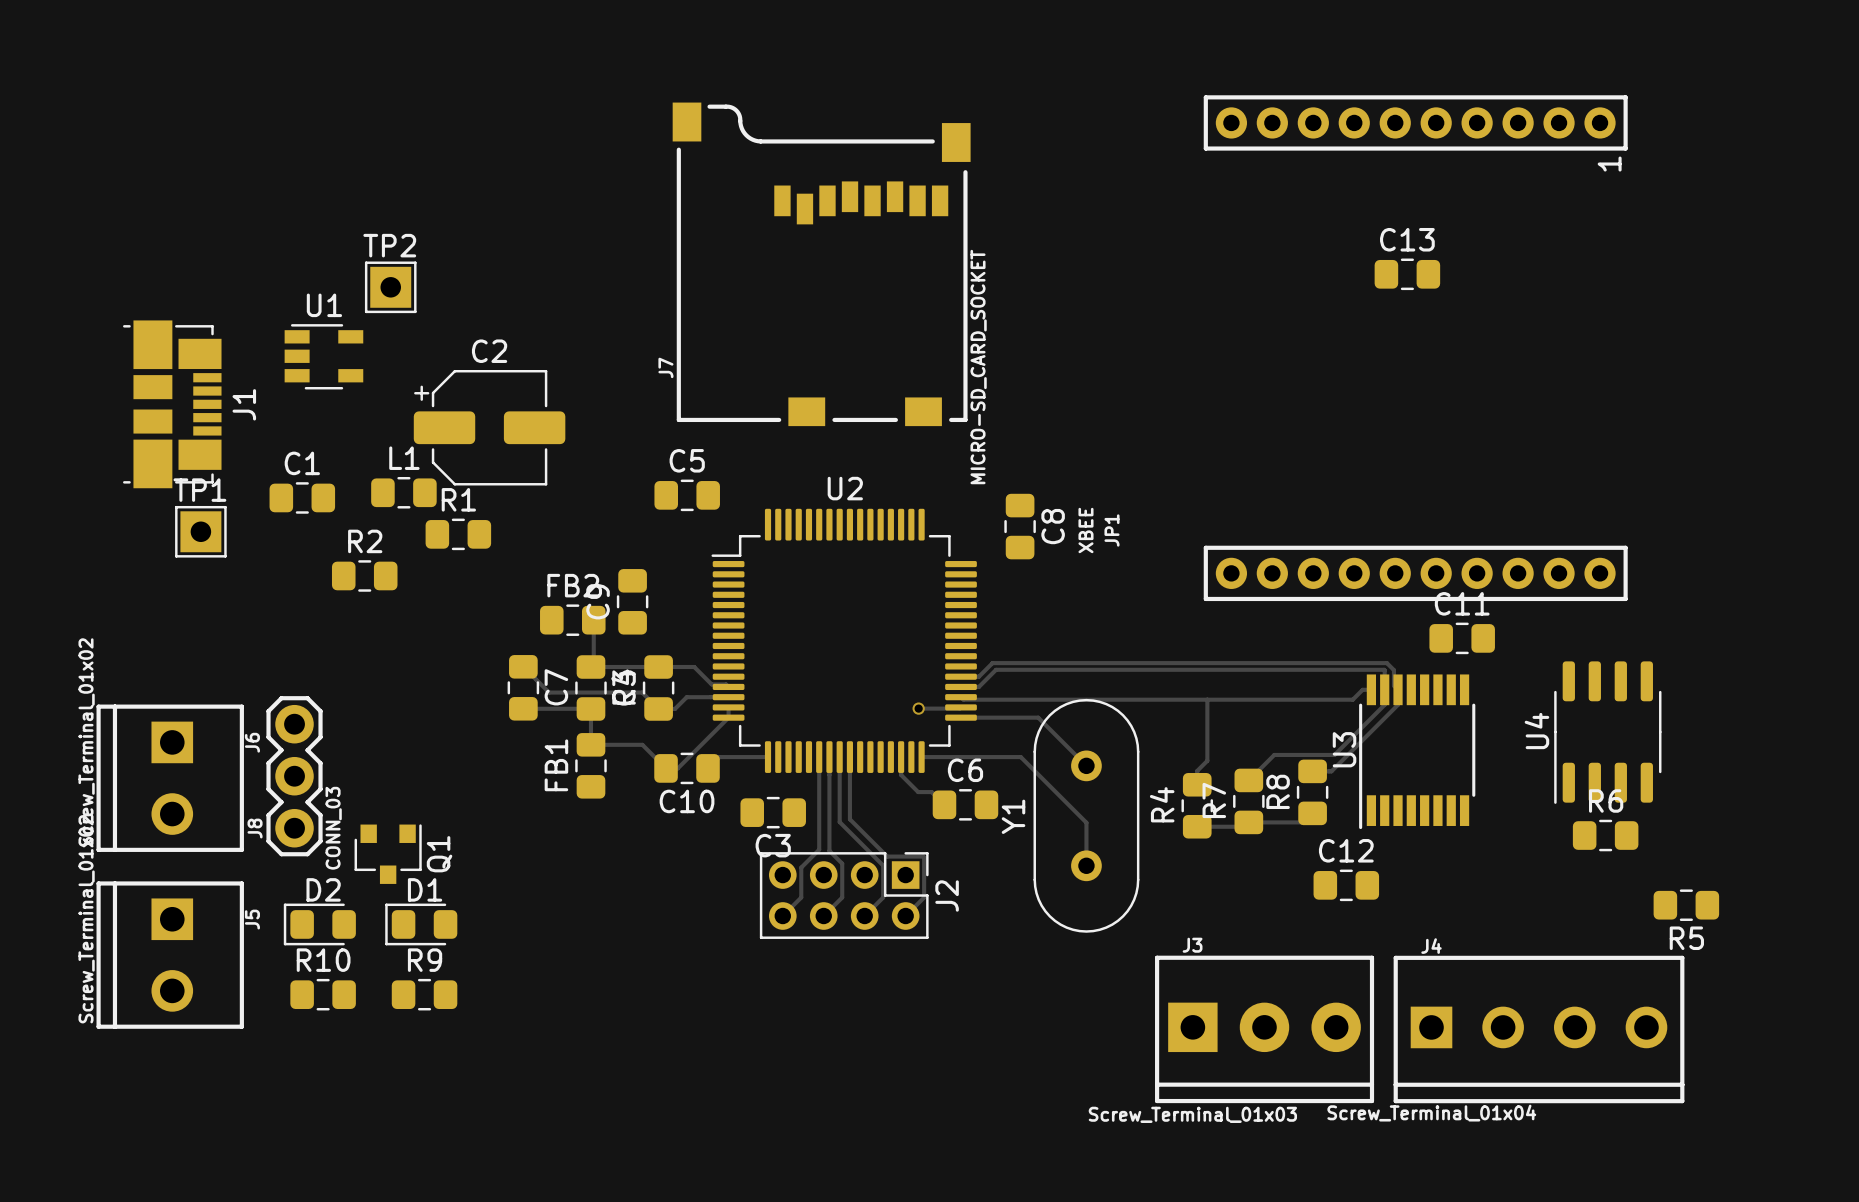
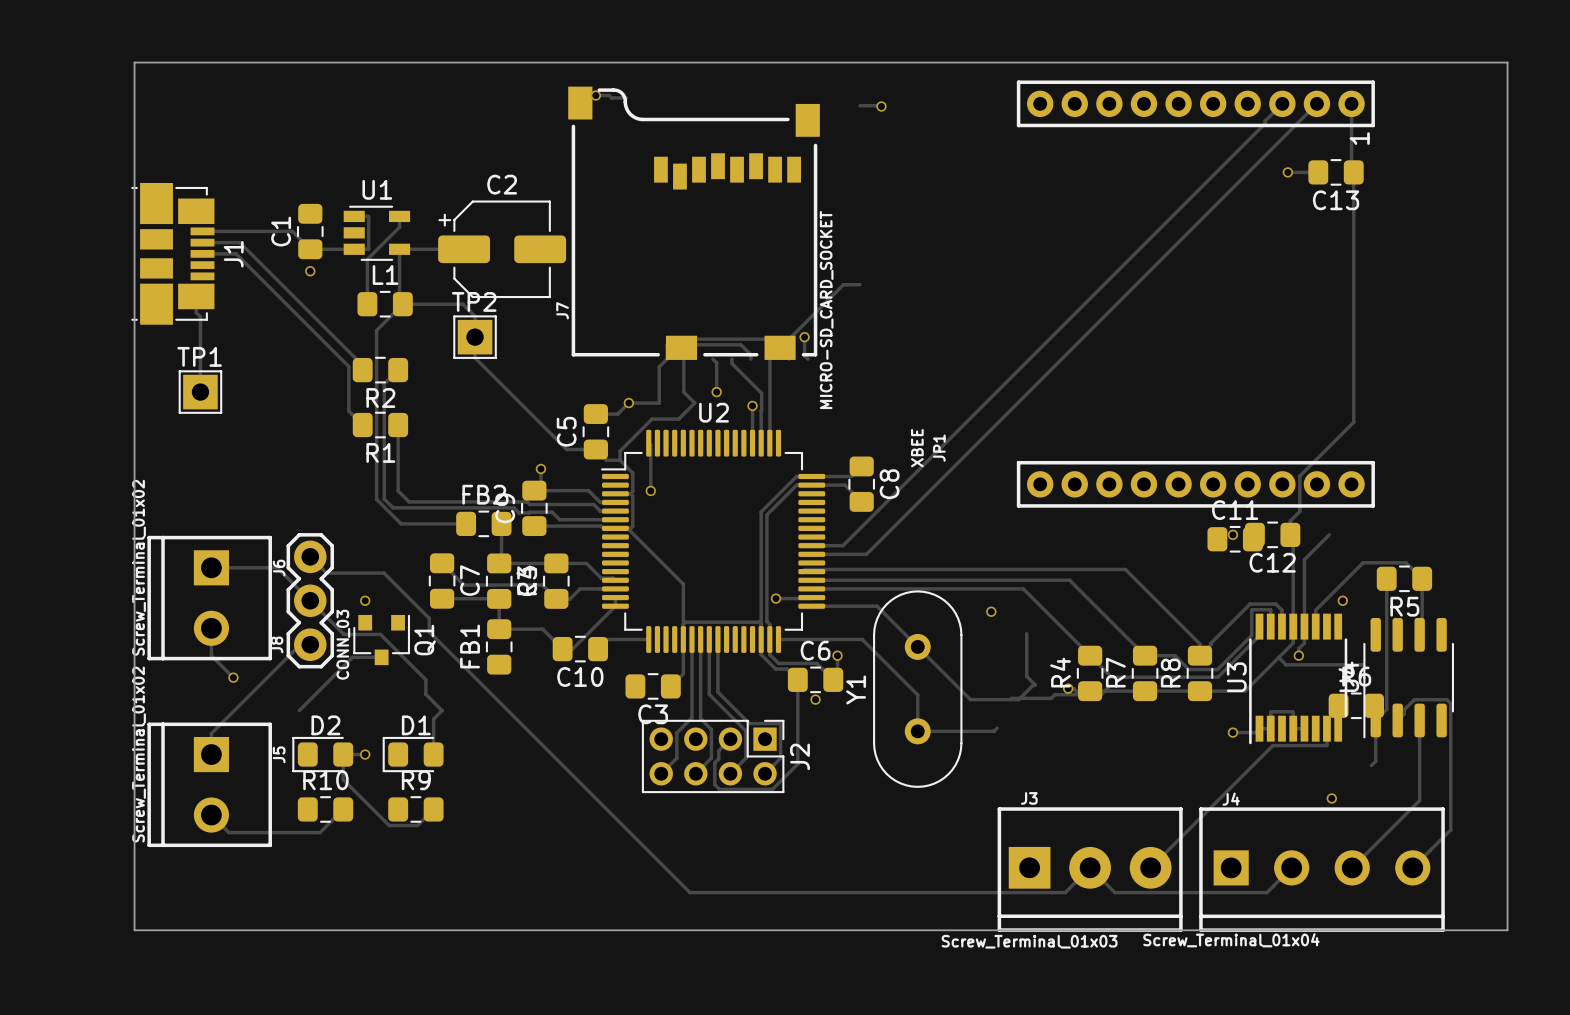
board edge: none -> (134, 62) (134, 930) (1507, 930) (1507, 62) (134, 62)
track: none -> (595, 95) (626, 97)
via: none -> (595, 95)
track: none -> (1282, 103) (1265, 120) (1265, 123) (842, 545) (811, 545)
track: none -> (1316, 103) (866, 554) (811, 554)
track: none -> (1351, 103) (1351, 170) (1353, 172) (1353, 422) (1299, 476) (1299, 511) (1290, 521) (1290, 534) (1293, 537) (1293, 643) (1245, 691) (1076, 691) (1073, 688) (1068, 688)
track: none -> (859, 105) (881, 106)
via: none -> (881, 106)
track: none -> (1287, 172) (1318, 172)
via: none -> (1287, 172)
C13 name position: C13 (1407, 239) -> C13 (1336, 200)
track: none -> (354, 216) (368, 216) (368, 249) (310, 249)
track: none -> (399, 216) (399, 227) (367, 259) (367, 304)
track: none -> (202, 231) (292, 231) (310, 249)
C13 position: (1407, 274) -> (1336, 172)
track: none -> (202, 242) (239, 242) (362, 365) (362, 370)
TP2 position: (390, 287) -> (475, 337)
track: none -> (464, 249) (399, 249) (399, 300) (402, 304)
track: none -> (202, 253) (236, 253) (348, 366) (348, 411) (362, 425)
via: none -> (310, 271)
track: none -> (859, 284) (843, 284) (788, 339) (788, 359)
track: none -> (196, 296) (196, 312) (200, 316) (200, 392)
U1 position: (323, 356) -> (376, 233)
track: none -> (402, 304) (462, 304) (475, 316) (475, 357) (566, 449) (595, 449) (606, 460) (620, 460)
track: none -> (402, 304) (376, 330) (376, 499) (401, 523) (466, 523)
track: none -> (804, 337) (804, 355) (808, 359)
via: none -> (804, 337)
track: none -> (788, 339) (673, 339) (667, 345) (667, 359) (659, 366) (659, 403) (628, 403) (617, 414) (595, 414)
J1 position: (172, 404) -> (172, 253)
track: none -> (712, 359) (716, 362) (716, 392)
track: none -> (731, 359) (731, 363) (761, 393) (761, 443)
track: none -> (750, 359) (750, 354) (740, 344) (684, 344) (683, 392) (694, 403) (678, 419) (652, 419) (620, 451) (620, 460)
track: none -> (769, 359) (769, 443)
C2 position: (489, 427) -> (502, 249)
track: none -> (398, 370) (384, 383) (384, 499) (393, 507) (513, 507) (518, 512) (552, 512) (559, 519) (615, 519)
C5 name position: C5 (687, 460) -> C5 (566, 431)
C1 name position: C1 (302, 463) -> C1 (281, 231)
via: none -> (716, 392)
via: none -> (628, 403)
track: none -> (752, 405) (752, 443)
via: none -> (752, 405)
L1 position: (403, 492) -> (385, 304)
C5 rotation: 0° (687, 495) -> 90° clockwise (595, 431)
C1 rotation: 0° (302, 497) -> 90° clockwise (310, 231)
C1 position: (302, 497) -> (310, 231)
R1 name position: R1 (458, 499) -> R1 (380, 452)
track: none -> (398, 425) (398, 490) (409, 501) (527, 501) (529, 504) (593, 504) (600, 511) (615, 511)
track: none -> (648, 443) (650, 445) (650, 490)
C8 position: (1020, 526) -> (861, 484)
TP1 position: (200, 531) -> (200, 392)
R1 position: (458, 534) -> (380, 425)
R2 name position: R2 (365, 541) -> R2 (380, 398)
track: none -> (620, 460) (632, 473) (632, 491) (630, 493)
track: none -> (861, 466) (851, 476) (796, 476) (761, 511) (761, 639)
track: none -> (540, 468) (540, 490) (588, 490) (600, 502) (615, 502)
via: none -> (540, 468)
R2 position: (364, 575) -> (380, 370)
via: none -> (650, 490)
track: none -> (630, 493) (632, 495) (632, 526) (630, 528) (603, 528) (601, 526) (540, 526)
track: none -> (861, 501) (844, 485) (796, 485) (766, 514) (766, 621) (769, 624) (769, 654) (778, 663) (816, 663) (833, 679) (837, 675) (837, 655)
track: none -> (627, 528) (683, 584) (683, 673) (670, 686)
via: none -> (1232, 534)
track: none -> (1329, 534) (1304, 559) (1304, 643) (1298, 648) (1298, 655)
track: none -> (310, 556) (326, 573) (383, 573) (429, 618) (429, 631) (690, 892) (1065, 892) (1090, 867) (1114, 892) (1266, 892) (1291, 867)
track: none -> (211, 567) (277, 567) (343, 634) (380, 634) (425, 679) (425, 694) (442, 710) (433, 719) (433, 754)
track: none -> (804, 569) (1125, 569) (1199, 644) (1199, 655) (1250, 604) (1275, 604) (1281, 610) (1281, 626)
track: (961, 676) (978, 676) (992, 663) (1386, 663) (1393, 670) (1393, 685) (1398, 689) (1398, 704) (1331, 771) (1312, 771) -> none
track: none -> (1386, 578) (1386, 709) (1375, 720) (1375, 761) (1371, 765)
track: (978, 686) (996, 669) (1384, 670) (1384, 704) (1334, 754) (1274, 754) (1248, 780) -> (826, 580) (1069, 580) (1145, 655) (1174, 655) (1188, 669) (1217, 669) (1251, 635) (1252, 609) (1270, 609) (1270, 626)
track: (1371, 689) (1362, 689) (1352, 699) (963, 699) (961, 697) -> (1259, 626) (1259, 635) (1217, 677) (1111, 677) (1023, 588) (811, 588)
track: (1207, 699) (1207, 760) (1197, 770) (1197, 784) -> none
via: none -> (365, 600)
via: none -> (1342, 600)
via: none -> (991, 611)
U4 position: (1607, 732) -> (1408, 678)
track: none -> (683, 624) (685, 622) (758, 622) (761, 624)
track: none -> (1315, 626) (1315, 610) (1363, 562) (1406, 562) (1422, 578) (1422, 632) (1419, 634)
track: none -> (211, 628) (211, 655) (233, 677)
track: none -> (1026, 633) (1026, 676) (1035, 684) (1018, 699) (970, 699) (917, 646)
U3 position: (1417, 751) -> (1298, 678)
track: none -> (310, 644) (300, 644) (211, 733) (211, 754)
J8 position: (294, 776) -> (310, 600)
via: none -> (837, 655)
via: none -> (1298, 655)
J6 position: (170, 778) -> (209, 598)
track: none -> (381, 657) (352, 657) (299, 710)
track: none -> (1278, 657) (1285, 664) (1362, 664) (1364, 666)
R8 position: (1312, 792) -> (1199, 673)
R7 position: (1248, 801) -> (1145, 673)
via: none -> (233, 677)
track: none -> (797, 679) (797, 764) (772, 789) (719, 789) (714, 784) (714, 762) (718, 758) (718, 750) (730, 739)
R4 position: (1197, 805) -> (1090, 673)
via: none -> (1068, 688)
via: none -> (815, 699)
C12 name position: C12 (1346, 850) -> C12 (1272, 562)
track: none -> (1397, 720) (1404, 714) (1404, 709) (1414, 699) (1446, 699) (1450, 703) (1450, 829) (1412, 867)
track: none -> (1419, 720) (1419, 800) (1352, 867)
Q1 position: (388, 854) -> (381, 639)
track: none -> (997, 728) (993, 731) (917, 731)
track: none -> (1304, 728) (1293, 728) (1292, 711) (1271, 711) (1270, 728) (1259, 728) (1255, 732) (1232, 732)
track: none -> (1326, 728) (1326, 745) (1272, 745) (1150, 867)
via: none -> (1232, 732)
C12 position: (1346, 885) -> (1272, 534)
track: none -> (365, 754) (343, 754) (343, 779) (389, 825) (417, 825) (433, 809)
via: none -> (365, 754)
R5 position: (1686, 905) -> (1404, 578)
D2 position: (319, 924) -> (322, 754)
D1 position: (421, 924) -> (413, 754)
via: none -> (1331, 798)
J5 position: (170, 955) -> (209, 784)
track: none -> (343, 809) (320, 832) (229, 832) (211, 815)
R10 position: (323, 994) -> (325, 809)
R9 position: (424, 994) -> (415, 809)
J3 position: (1264, 1029) -> (1090, 869)
J4 position: (1539, 1029) -> (1321, 869)

